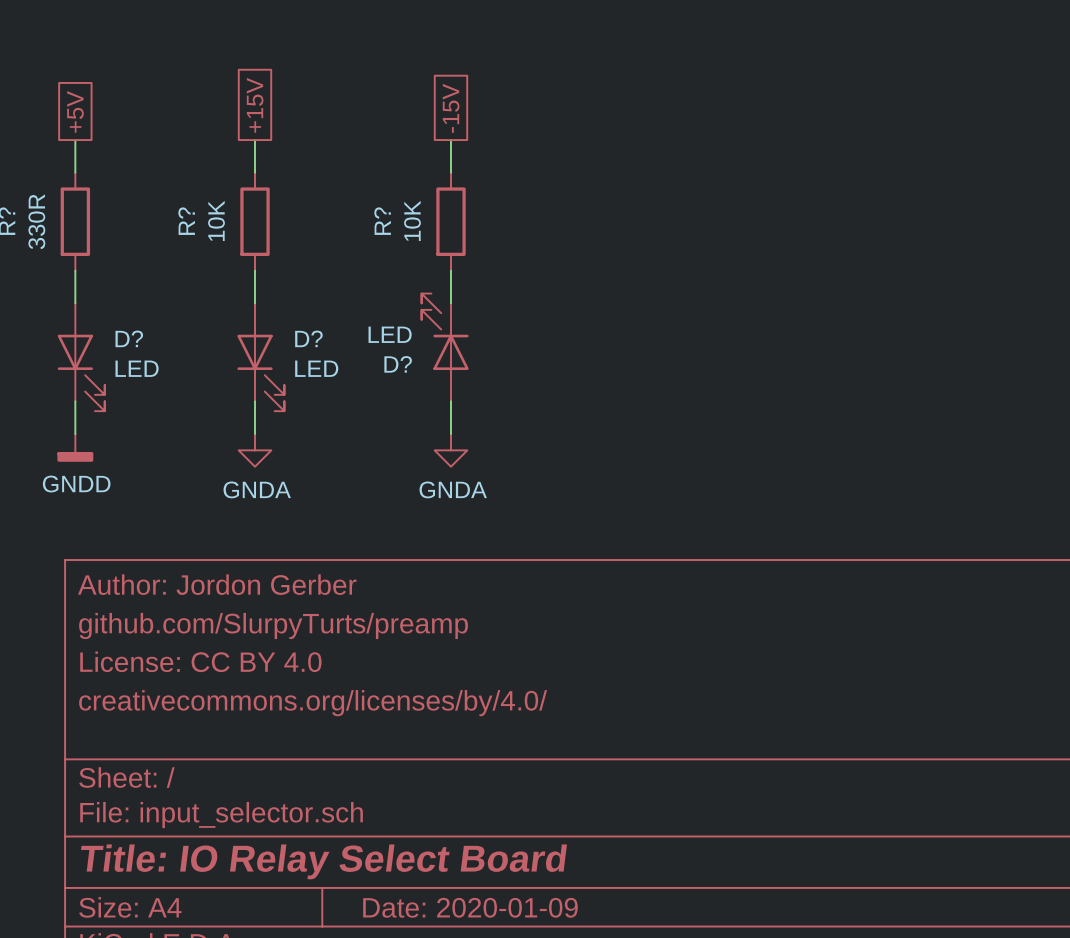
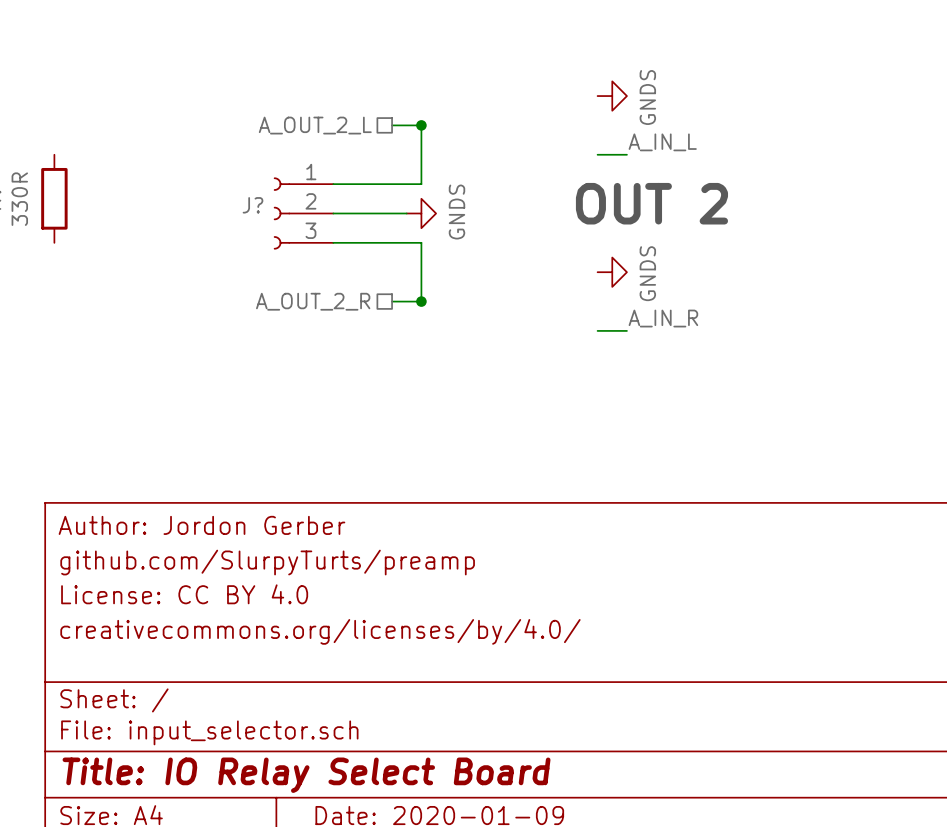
global label: +15V (255, 105) -> none
power symbol: none -> GNDS (612, 96)
global label: -15V (451, 108) -> none
global label: +5V (75, 111) -> none
wire: (75, 140) (75, 172) -> none
wire: (255, 140) (255, 172) -> none
wire: (450, 140) (450, 172) -> (392, 125) (421, 125) (421, 184) (333, 184)
junction: none -> (421, 125)
hierarchical label: none -> A_OUT_2_L (315, 125)
label: none -> A_IN_L (662, 142)
wire: none -> (597, 154) (626, 154)
R?: 10K (255, 221) -> none
R?: 10K (450, 221) -> none
text: none -> OUT 2 (651, 203)
J?: none -> (303, 213)
wire: none -> (333, 213) (406, 213)
power symbol: none -> GNDS (421, 213)
wire: (75, 270) (75, 303) -> none
wire: (255, 270) (255, 303) -> none
wire: none -> (333, 242) (421, 242) (421, 301) (392, 301)
wire: (450, 270) (450, 303) -> none
power symbol: none -> GNDS (612, 272)
junction: none -> (421, 301)
hierarchical label: none -> A_OUT_2_R (313, 301)
D?: LED (445, 347) -> none
label: none -> A_IN_R (663, 318)
D?: LED (81, 357) -> none
D?: LED (260, 357) -> none
wire: none -> (597, 330) (626, 330)
wire: (75, 401) (75, 434) -> none
wire: (255, 401) (255, 434) -> none
wire: (450, 401) (450, 434) -> none
power symbol: GNDD (75, 447) -> none
power symbol: GNDA (255, 450) -> none
power symbol: GNDA (450, 450) -> none

